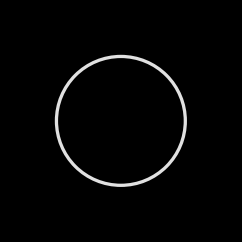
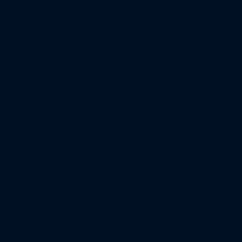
drawing: [54, 54, 187, 187] -> none

